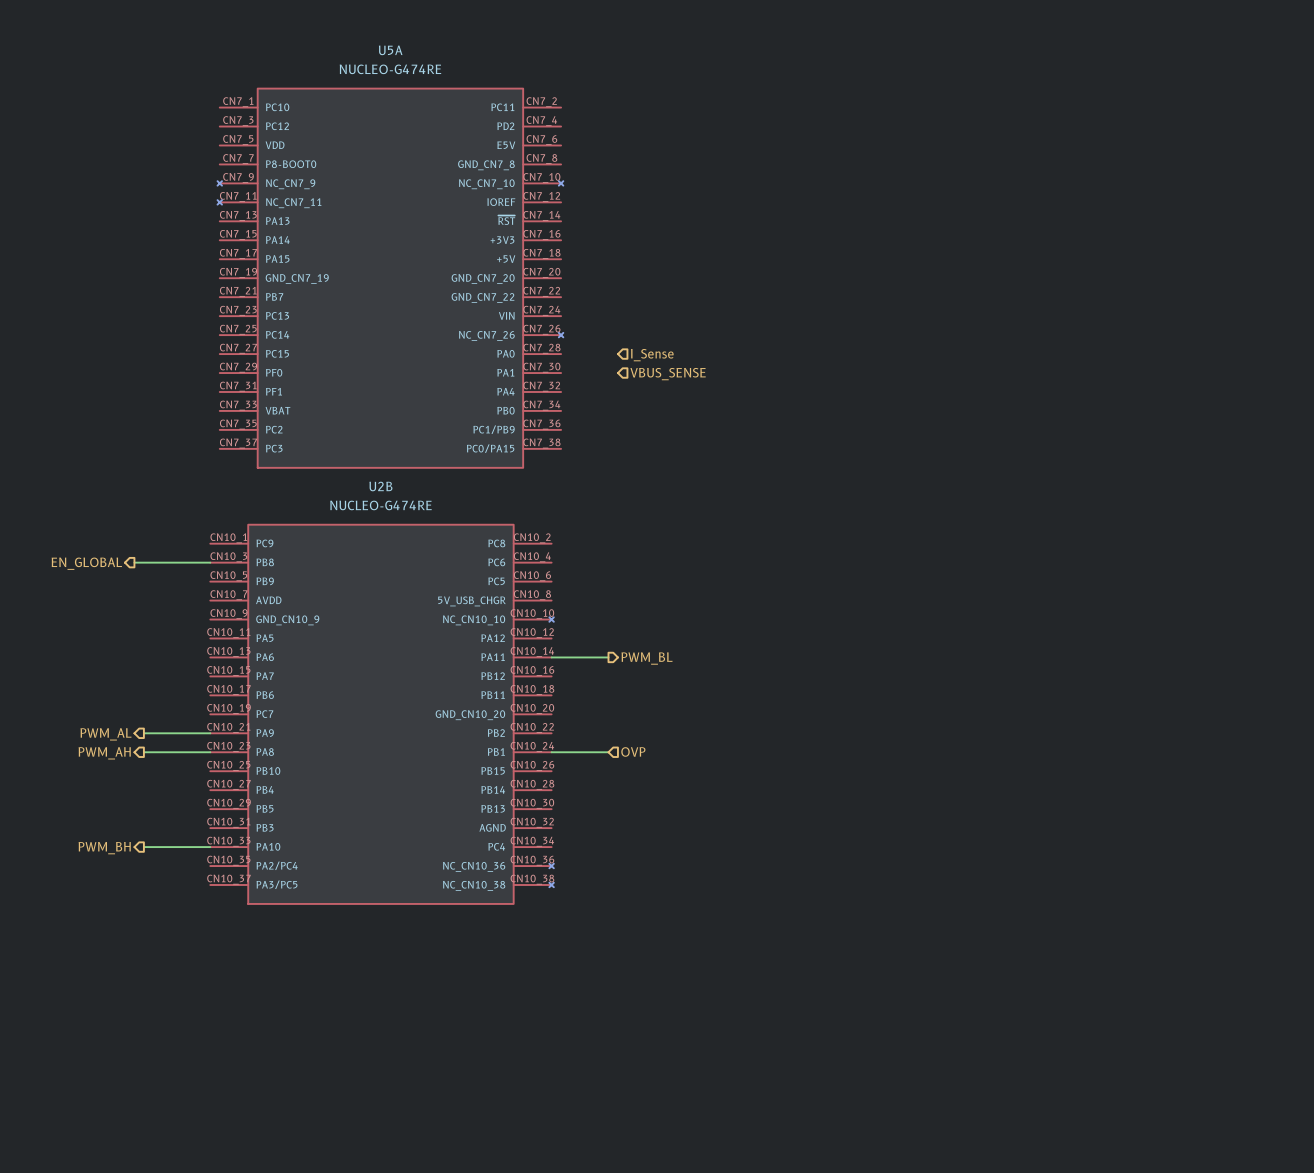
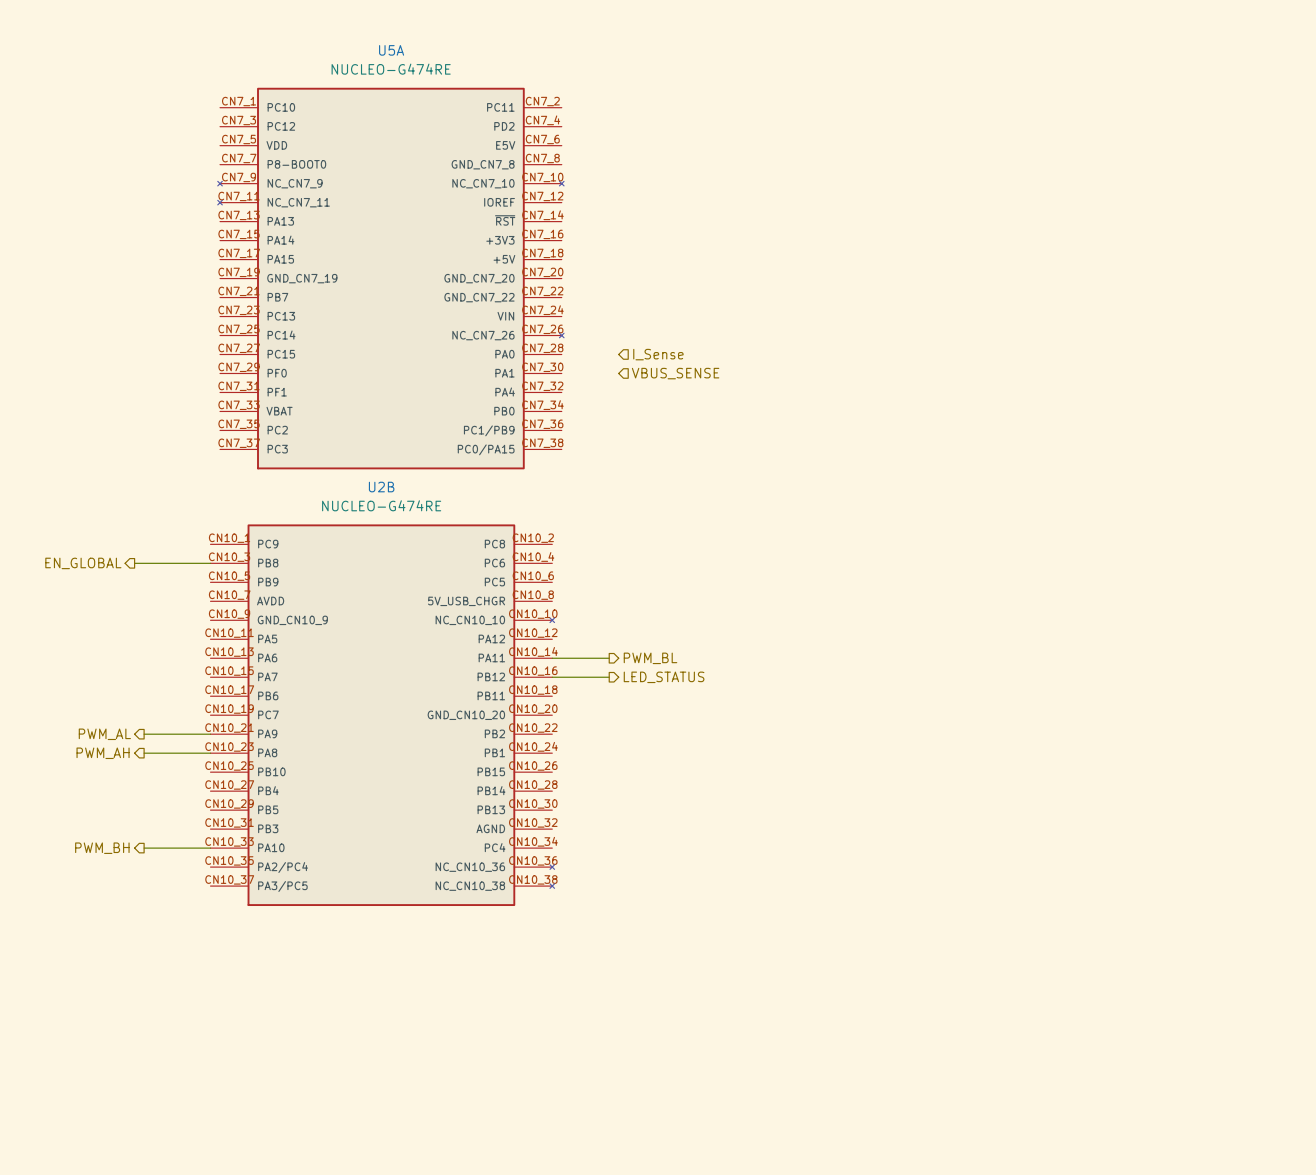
hierarchical label: none -> LED_STATUS (664, 677)
hierarchical label: OVP (633, 751) -> none
wire: (551, 752) (608, 752) -> (552, 677) (609, 677)

